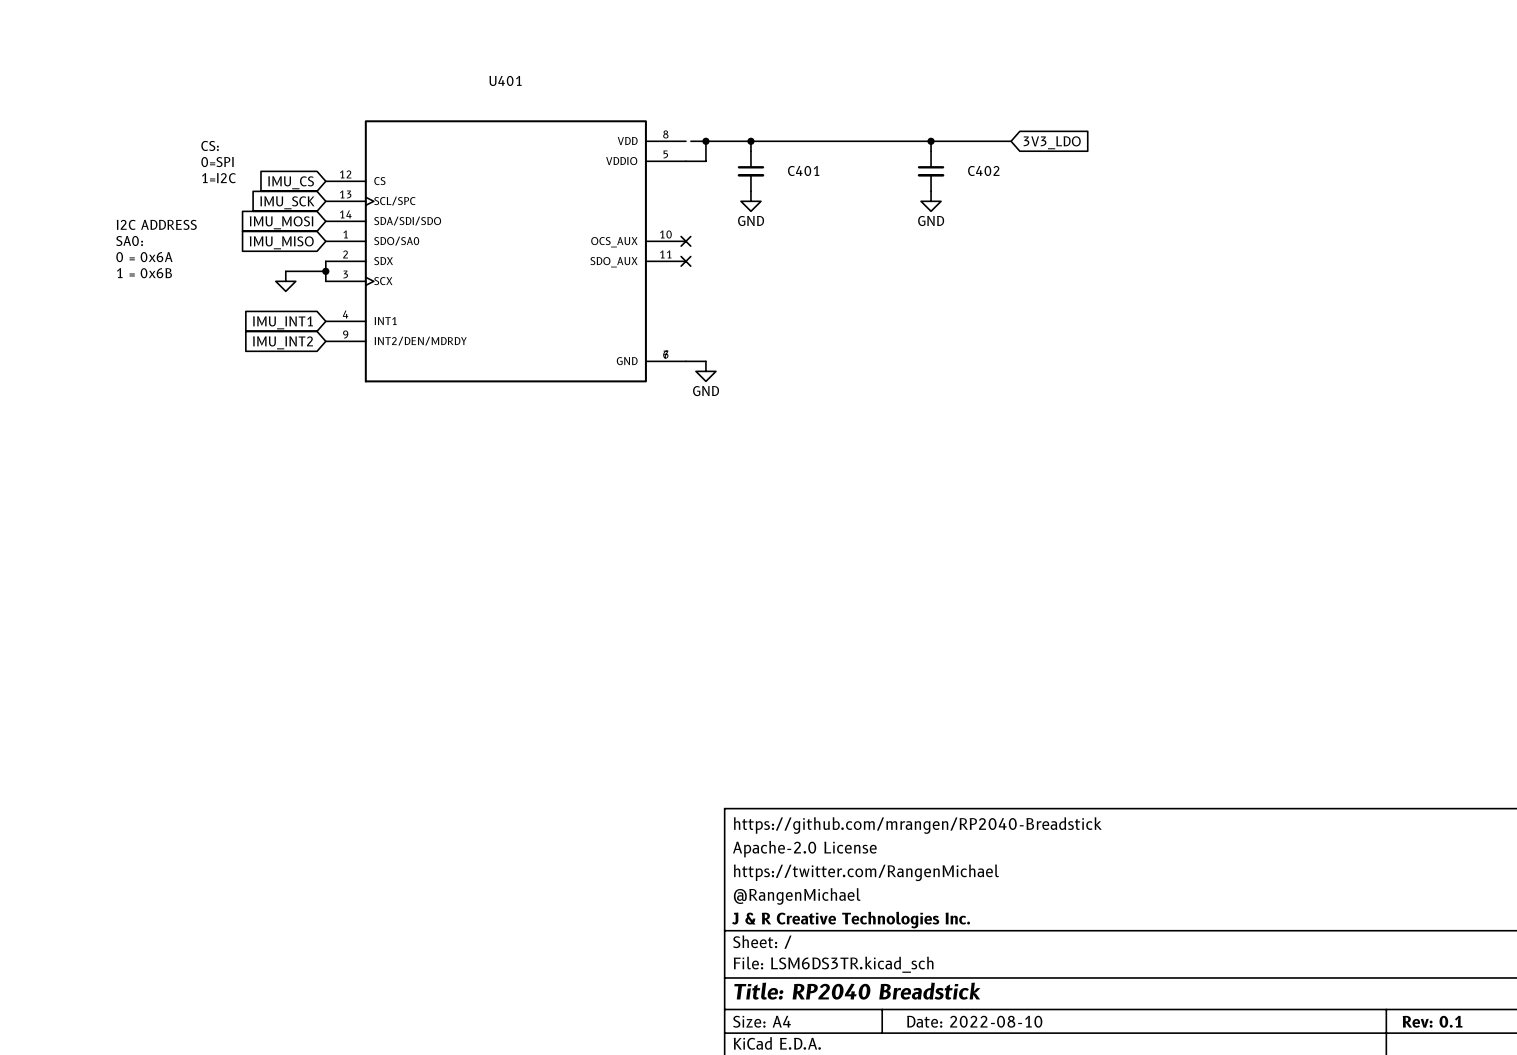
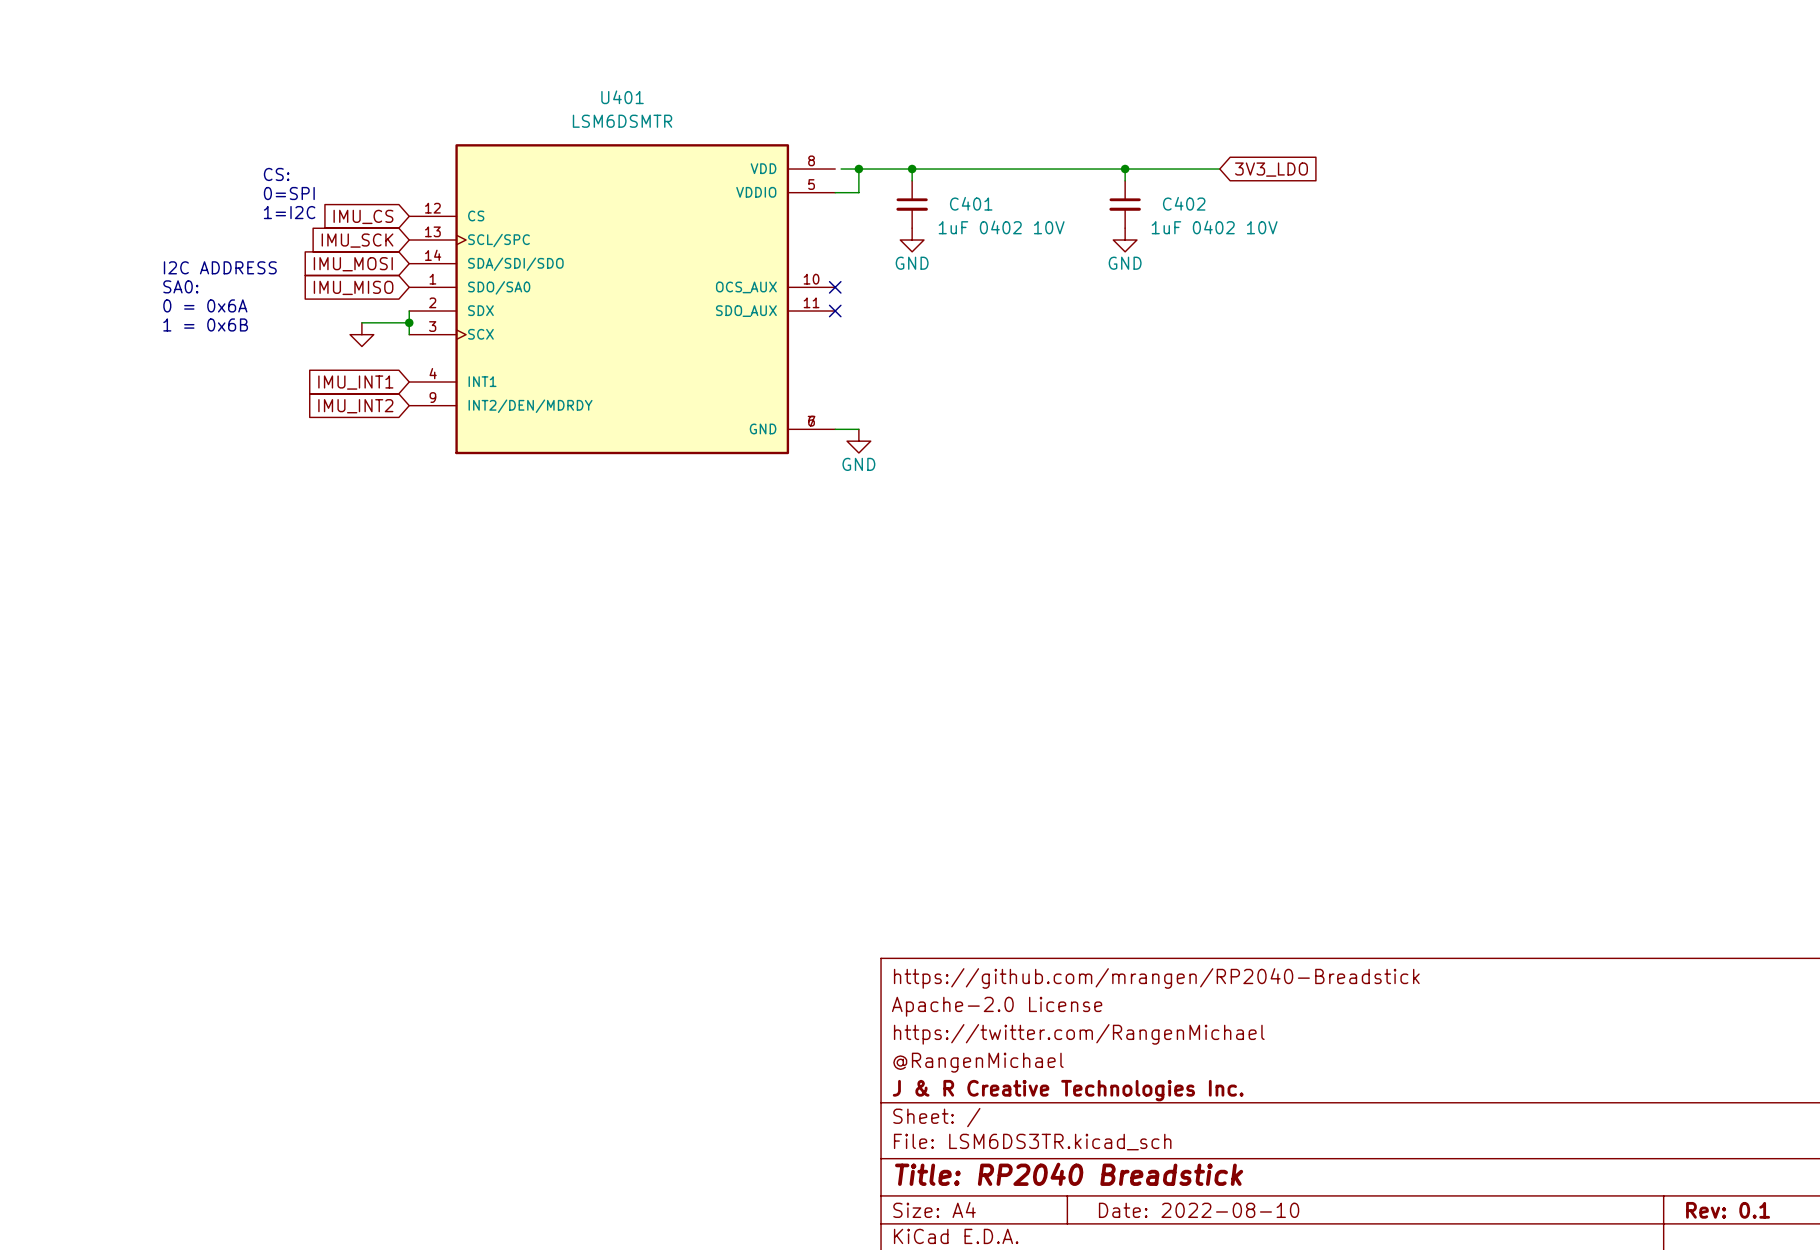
U401 value: none -> LSM6DSMTR (622, 121)
C401 value: none -> 1uF 0402 10V (1001, 227)
C402 value: none -> 1uF 0402 10V (1214, 227)

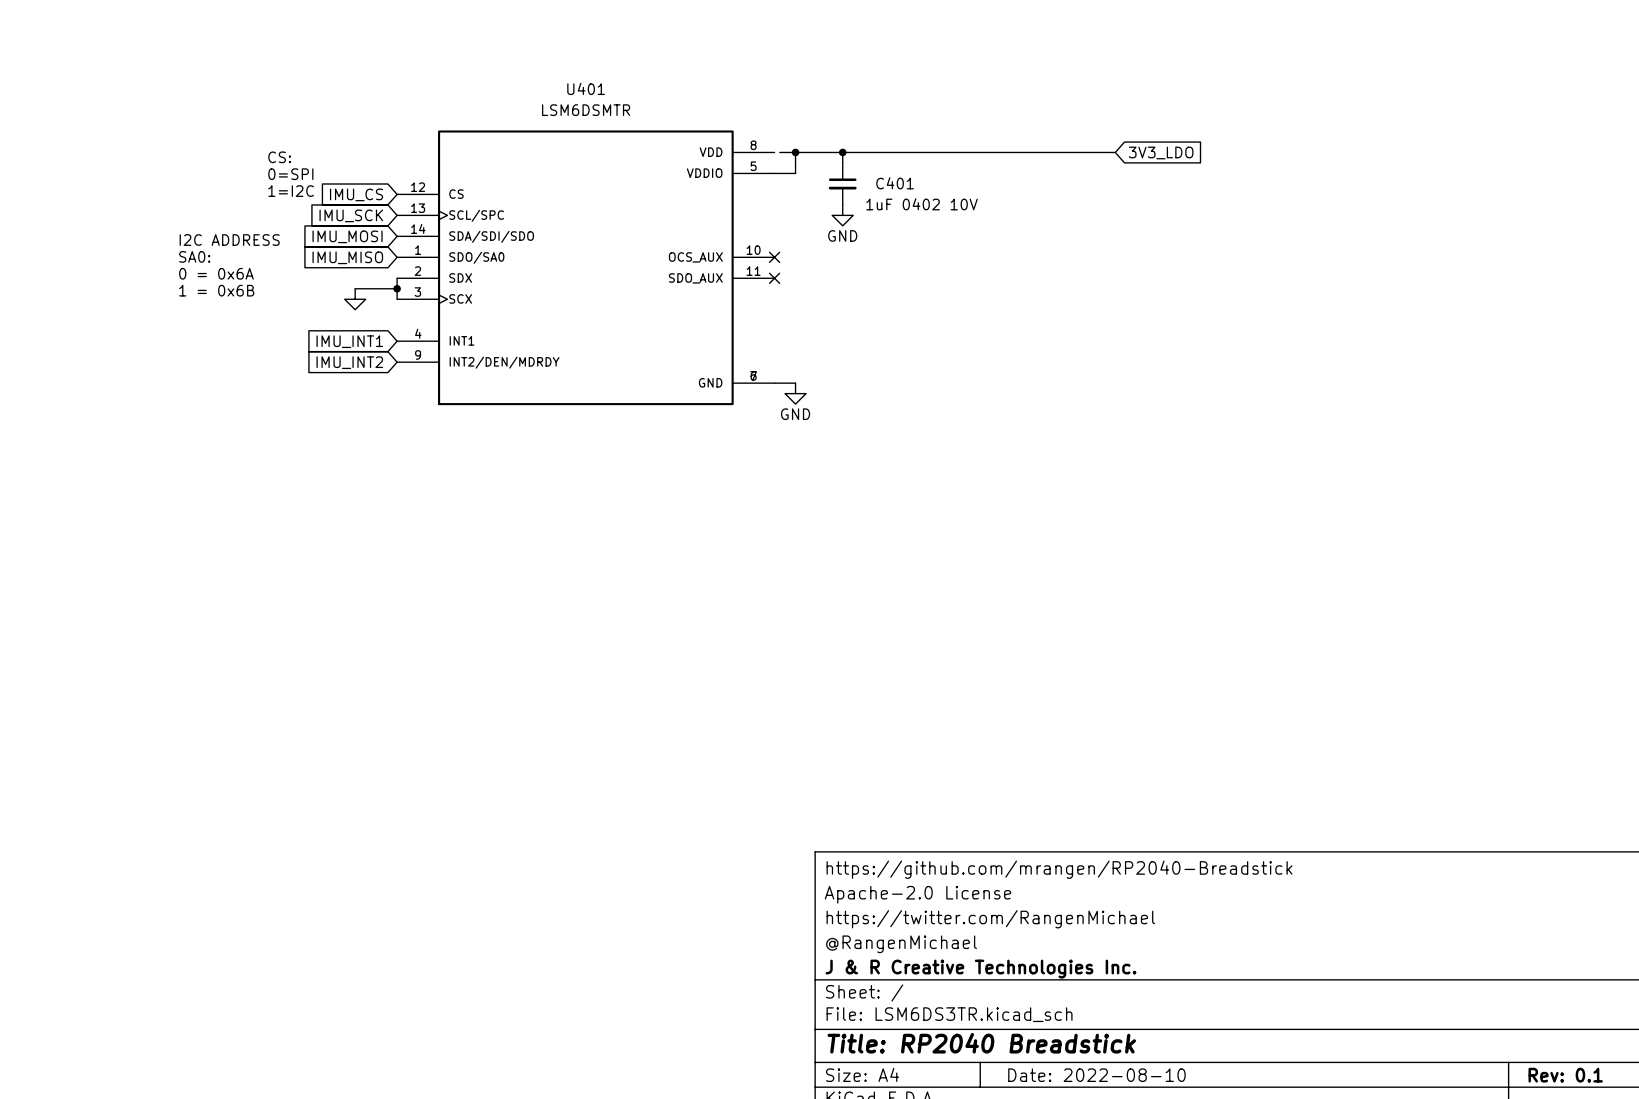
wire: (1125, 169) (1125, 180) -> none
junction: (1125, 169) -> none
C402: 1uF 0402 10V (1125, 204) -> none
power symbol: GND (1125, 240) -> none

